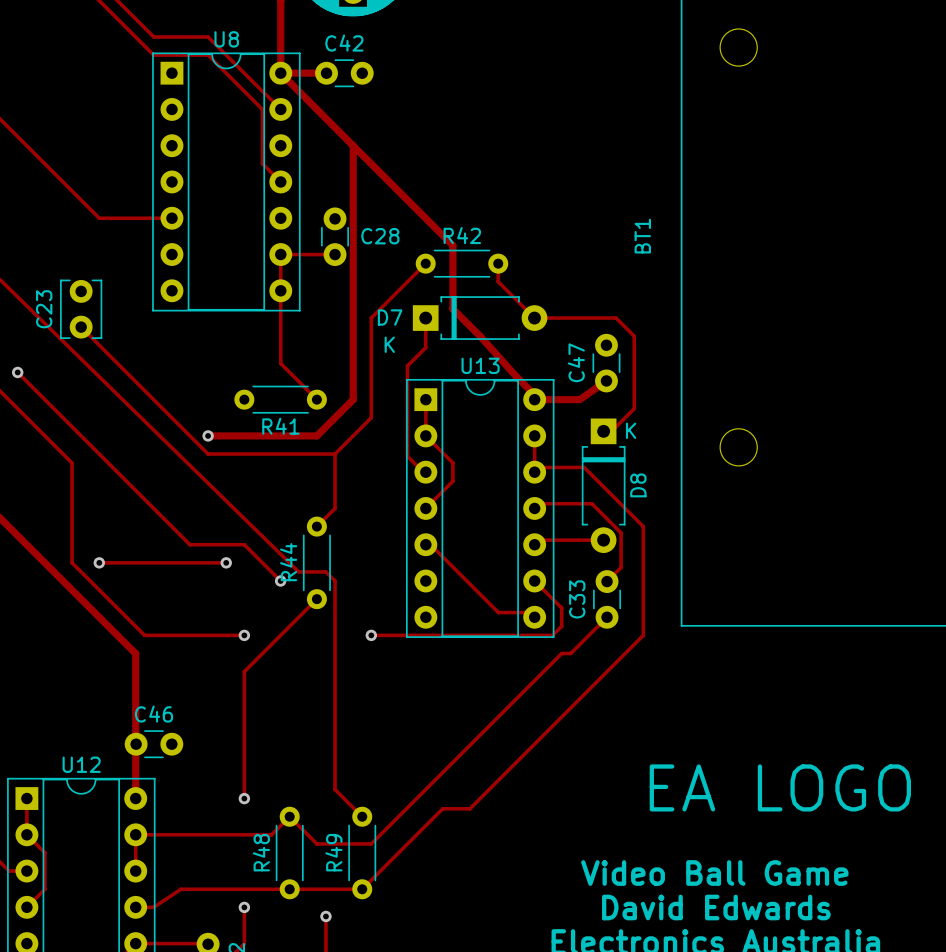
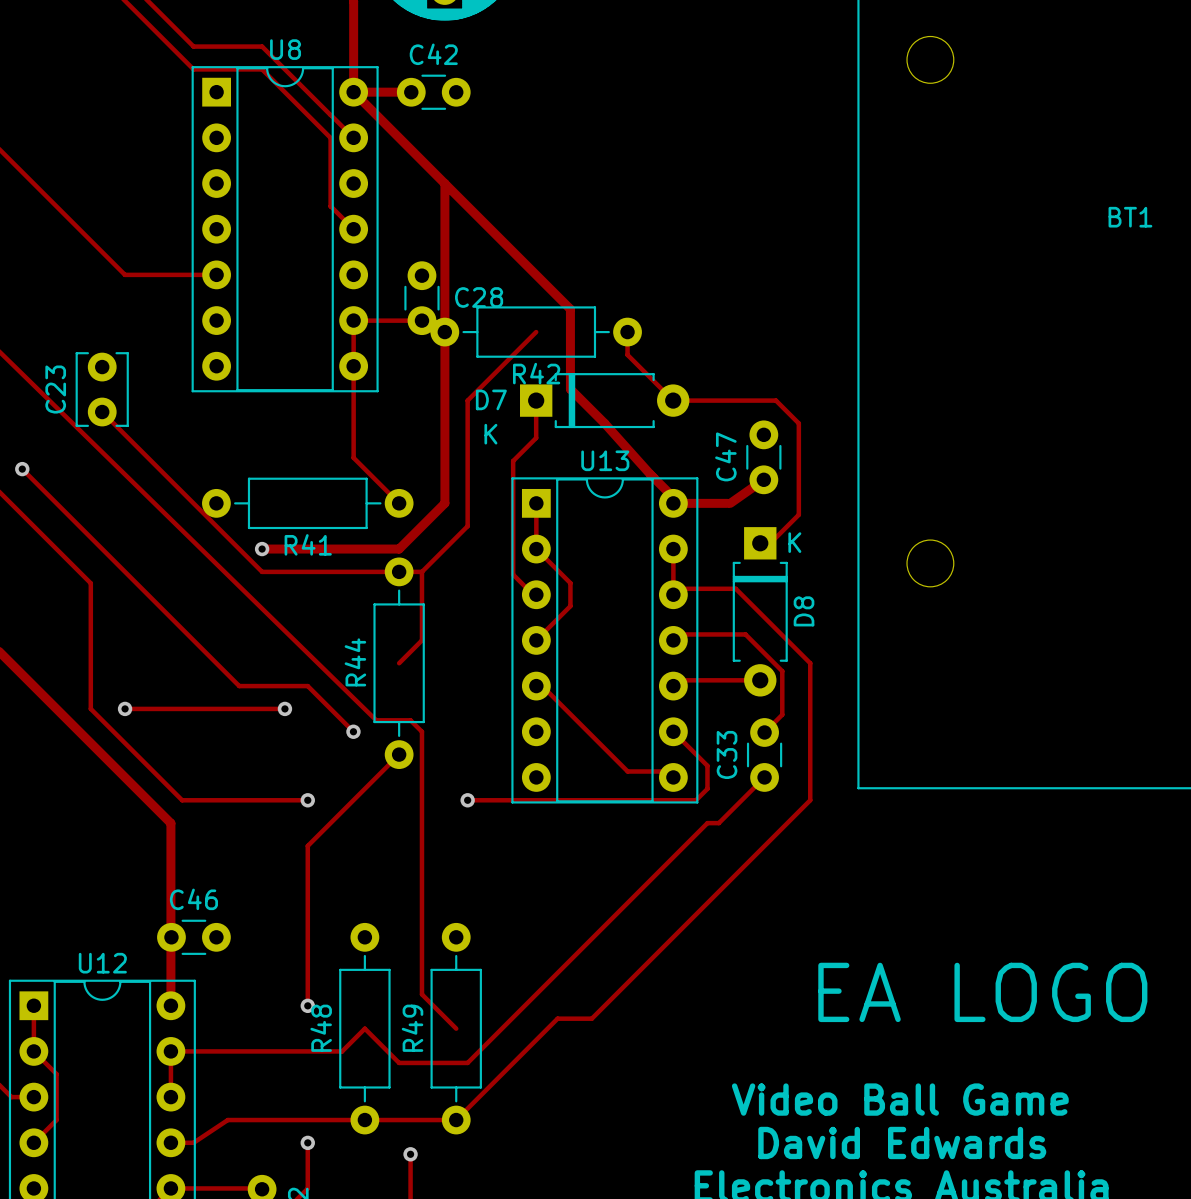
R42 name position: R42 (462, 235) -> R42 (536, 373)
BT1 name rotation: 0° (642, 236) -> 90° clockwise (1130, 217)
BT1 name position: BT1 (642, 236) -> BT1 (1130, 217)
R42 footprint: [415, 249, 509, 278] -> [430, 306, 642, 358]
R41 footprint: [234, 385, 327, 414] -> [202, 477, 414, 530]
R44 footprint: [302, 516, 331, 610] -> [373, 557, 425, 769]
R48 footprint: [275, 806, 304, 900] -> [339, 922, 391, 1135]
R49 footprint: [348, 806, 377, 900] -> [430, 922, 482, 1135]

